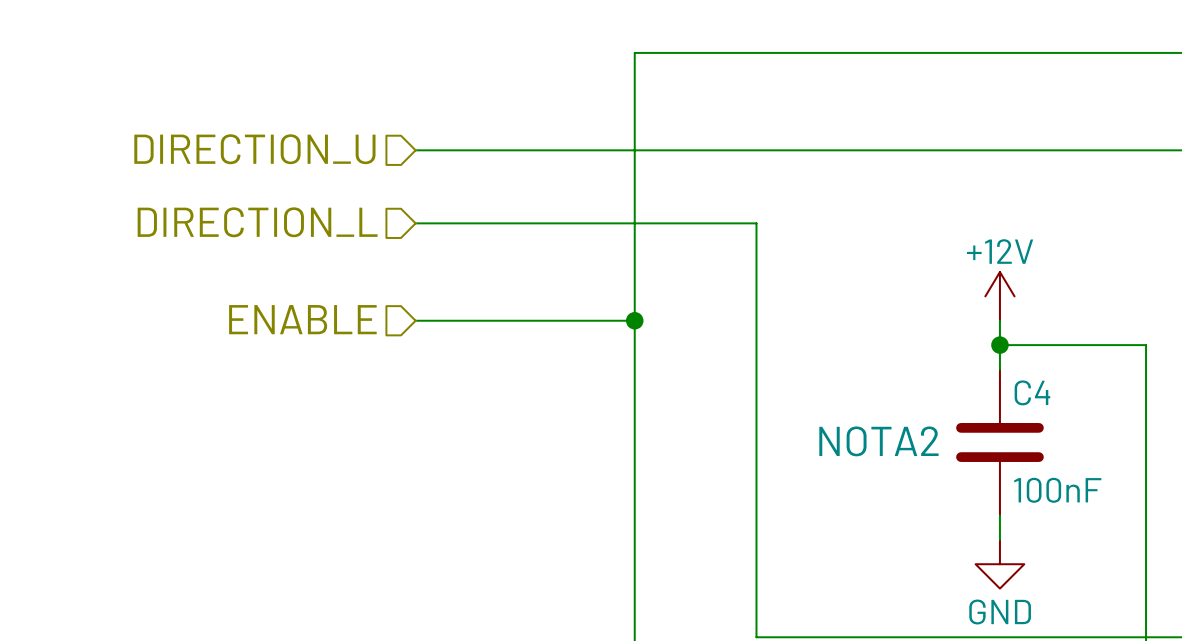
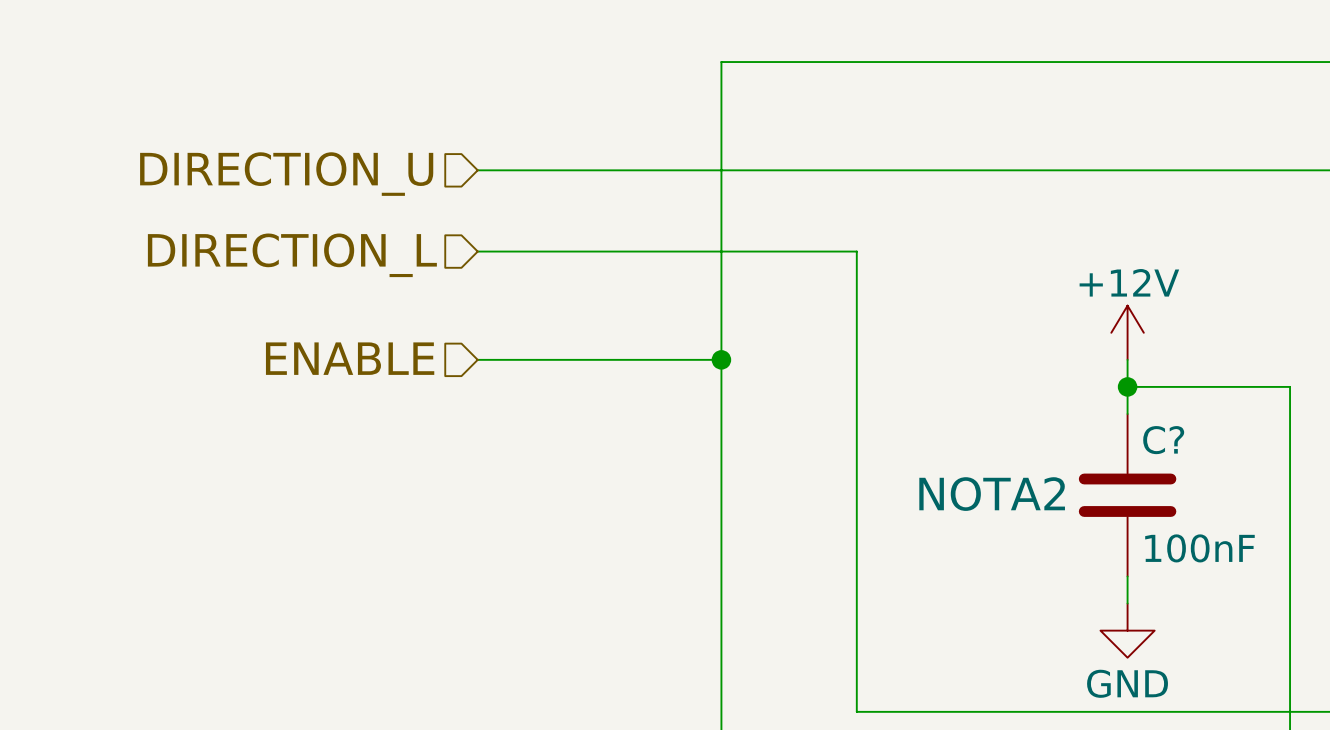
C4 name: C4 (1032, 392) -> C? (1163, 440)

